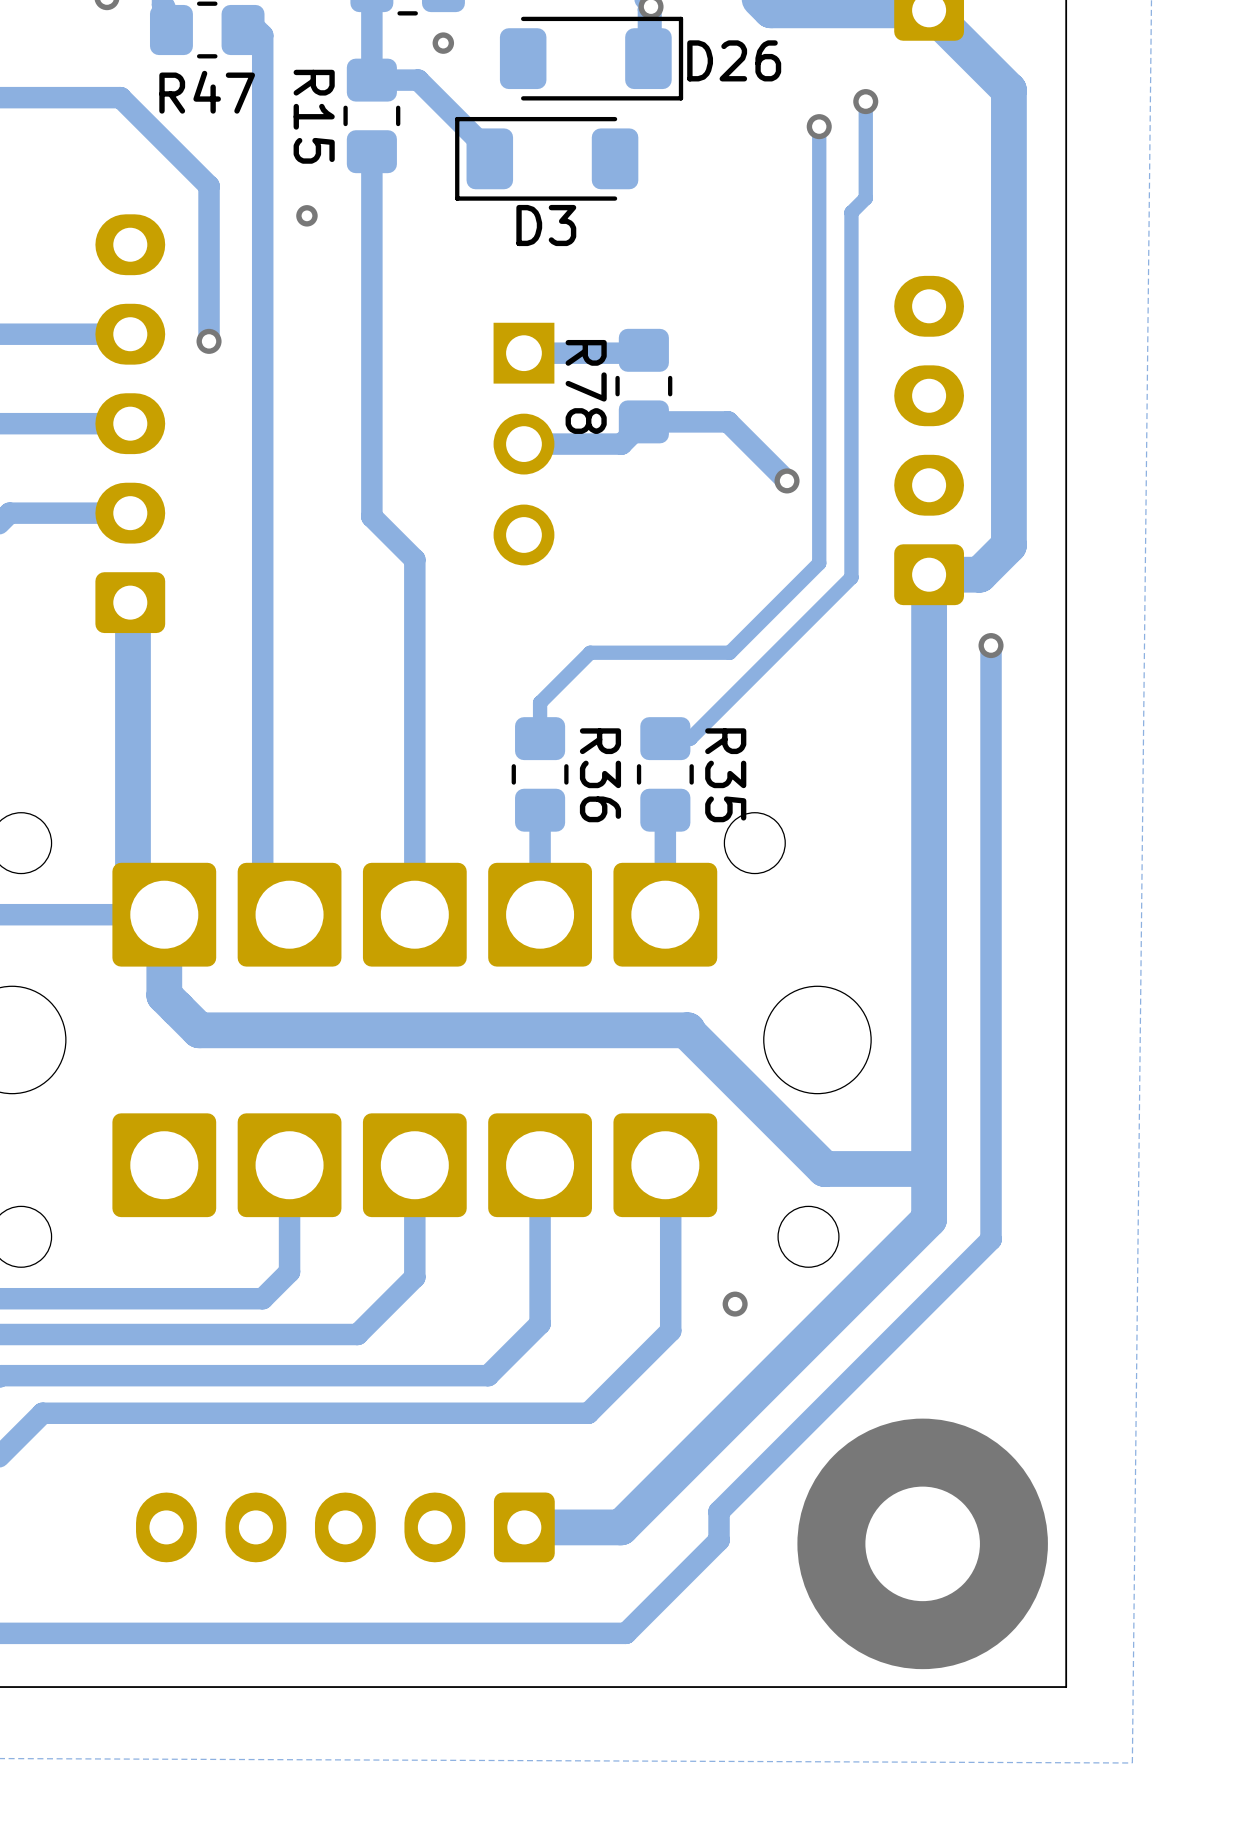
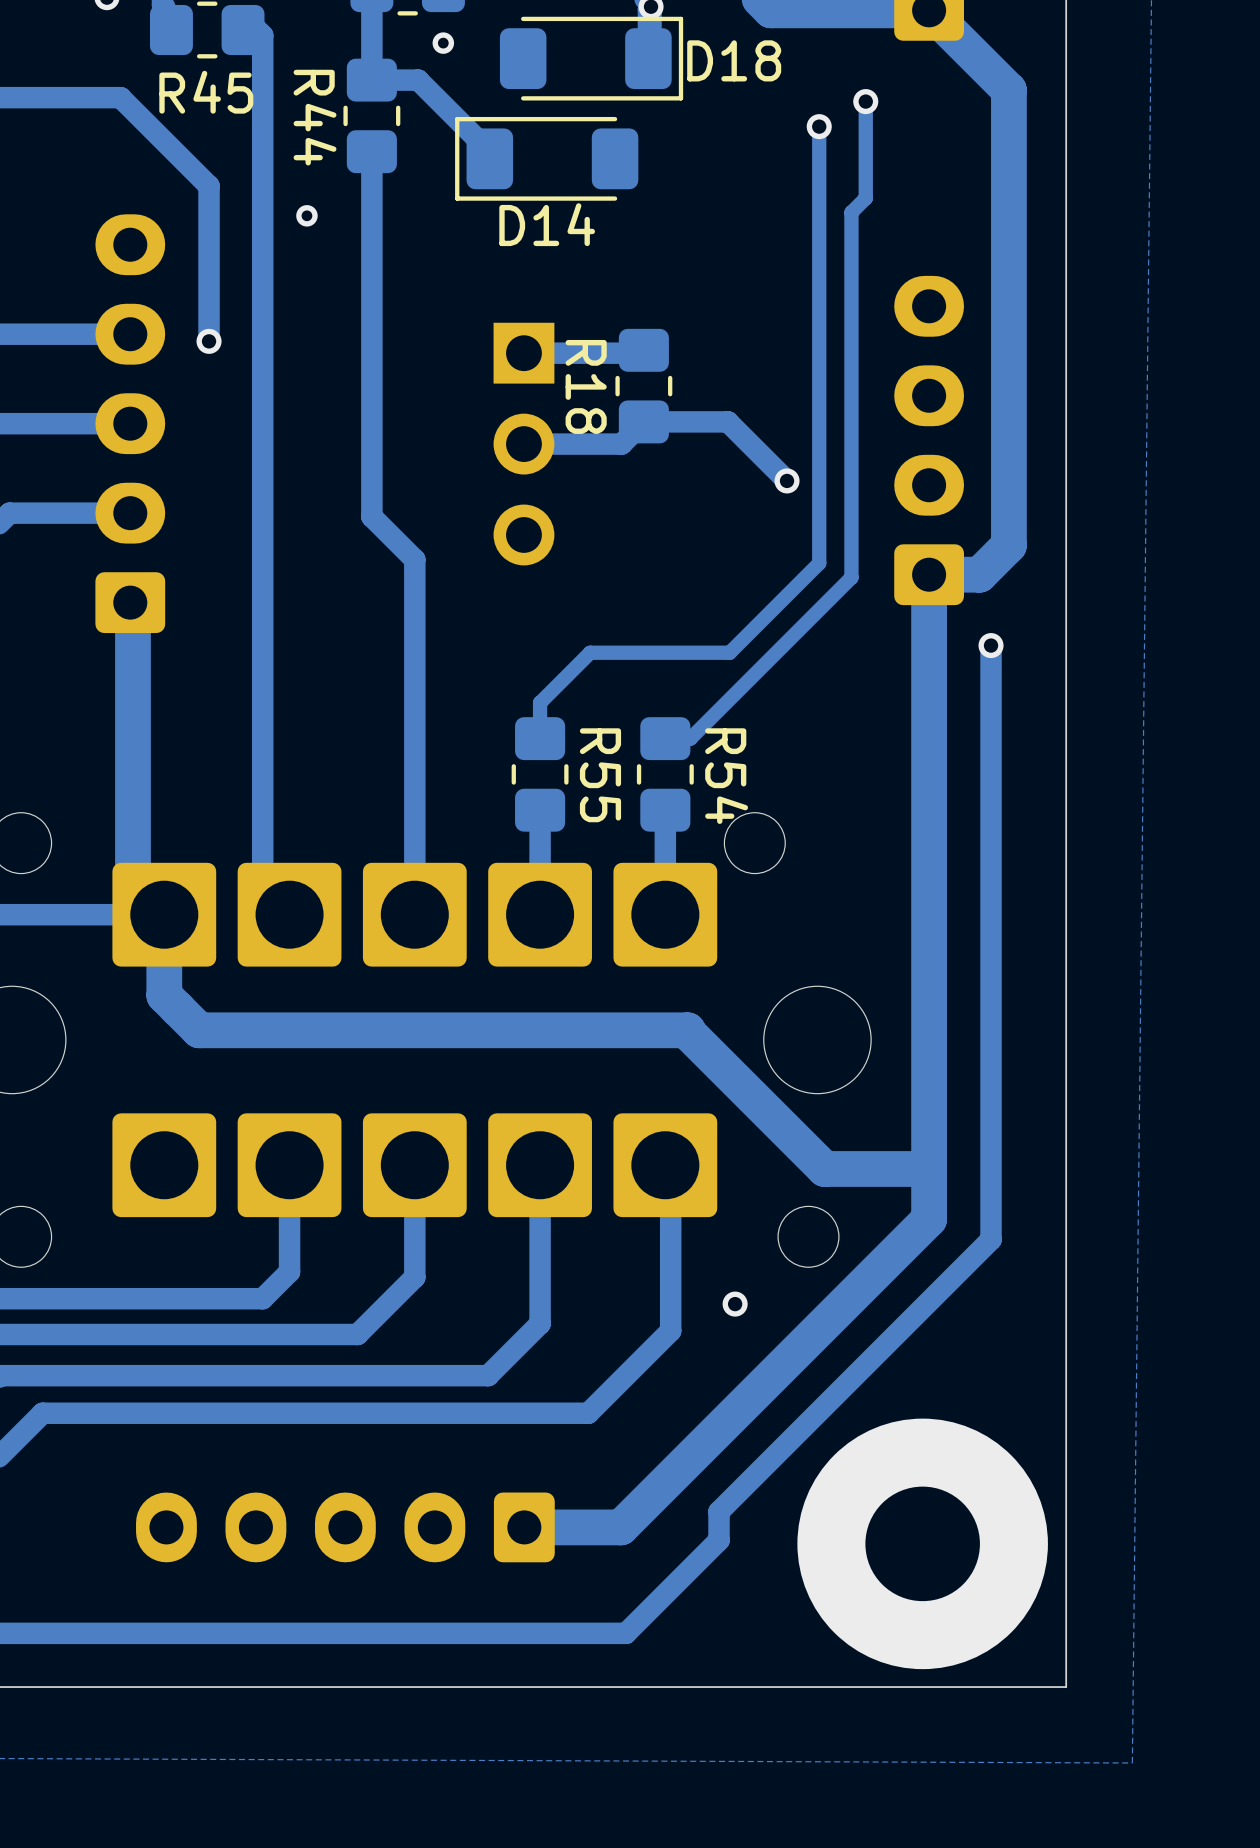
D26 name: D26 (734, 60) -> D18 (734, 60)
R47 name: R47 (207, 92) -> R45 (206, 92)
R15 name: R15 (314, 116) -> R44 (315, 117)
D3 name: D3 (546, 225) -> D14 (547, 224)
R78 name: R78 (586, 386) -> R18 (586, 386)
R36 name: R36 (600, 775) -> R55 (600, 775)
R35 name: R35 (725, 775) -> R54 (726, 776)

